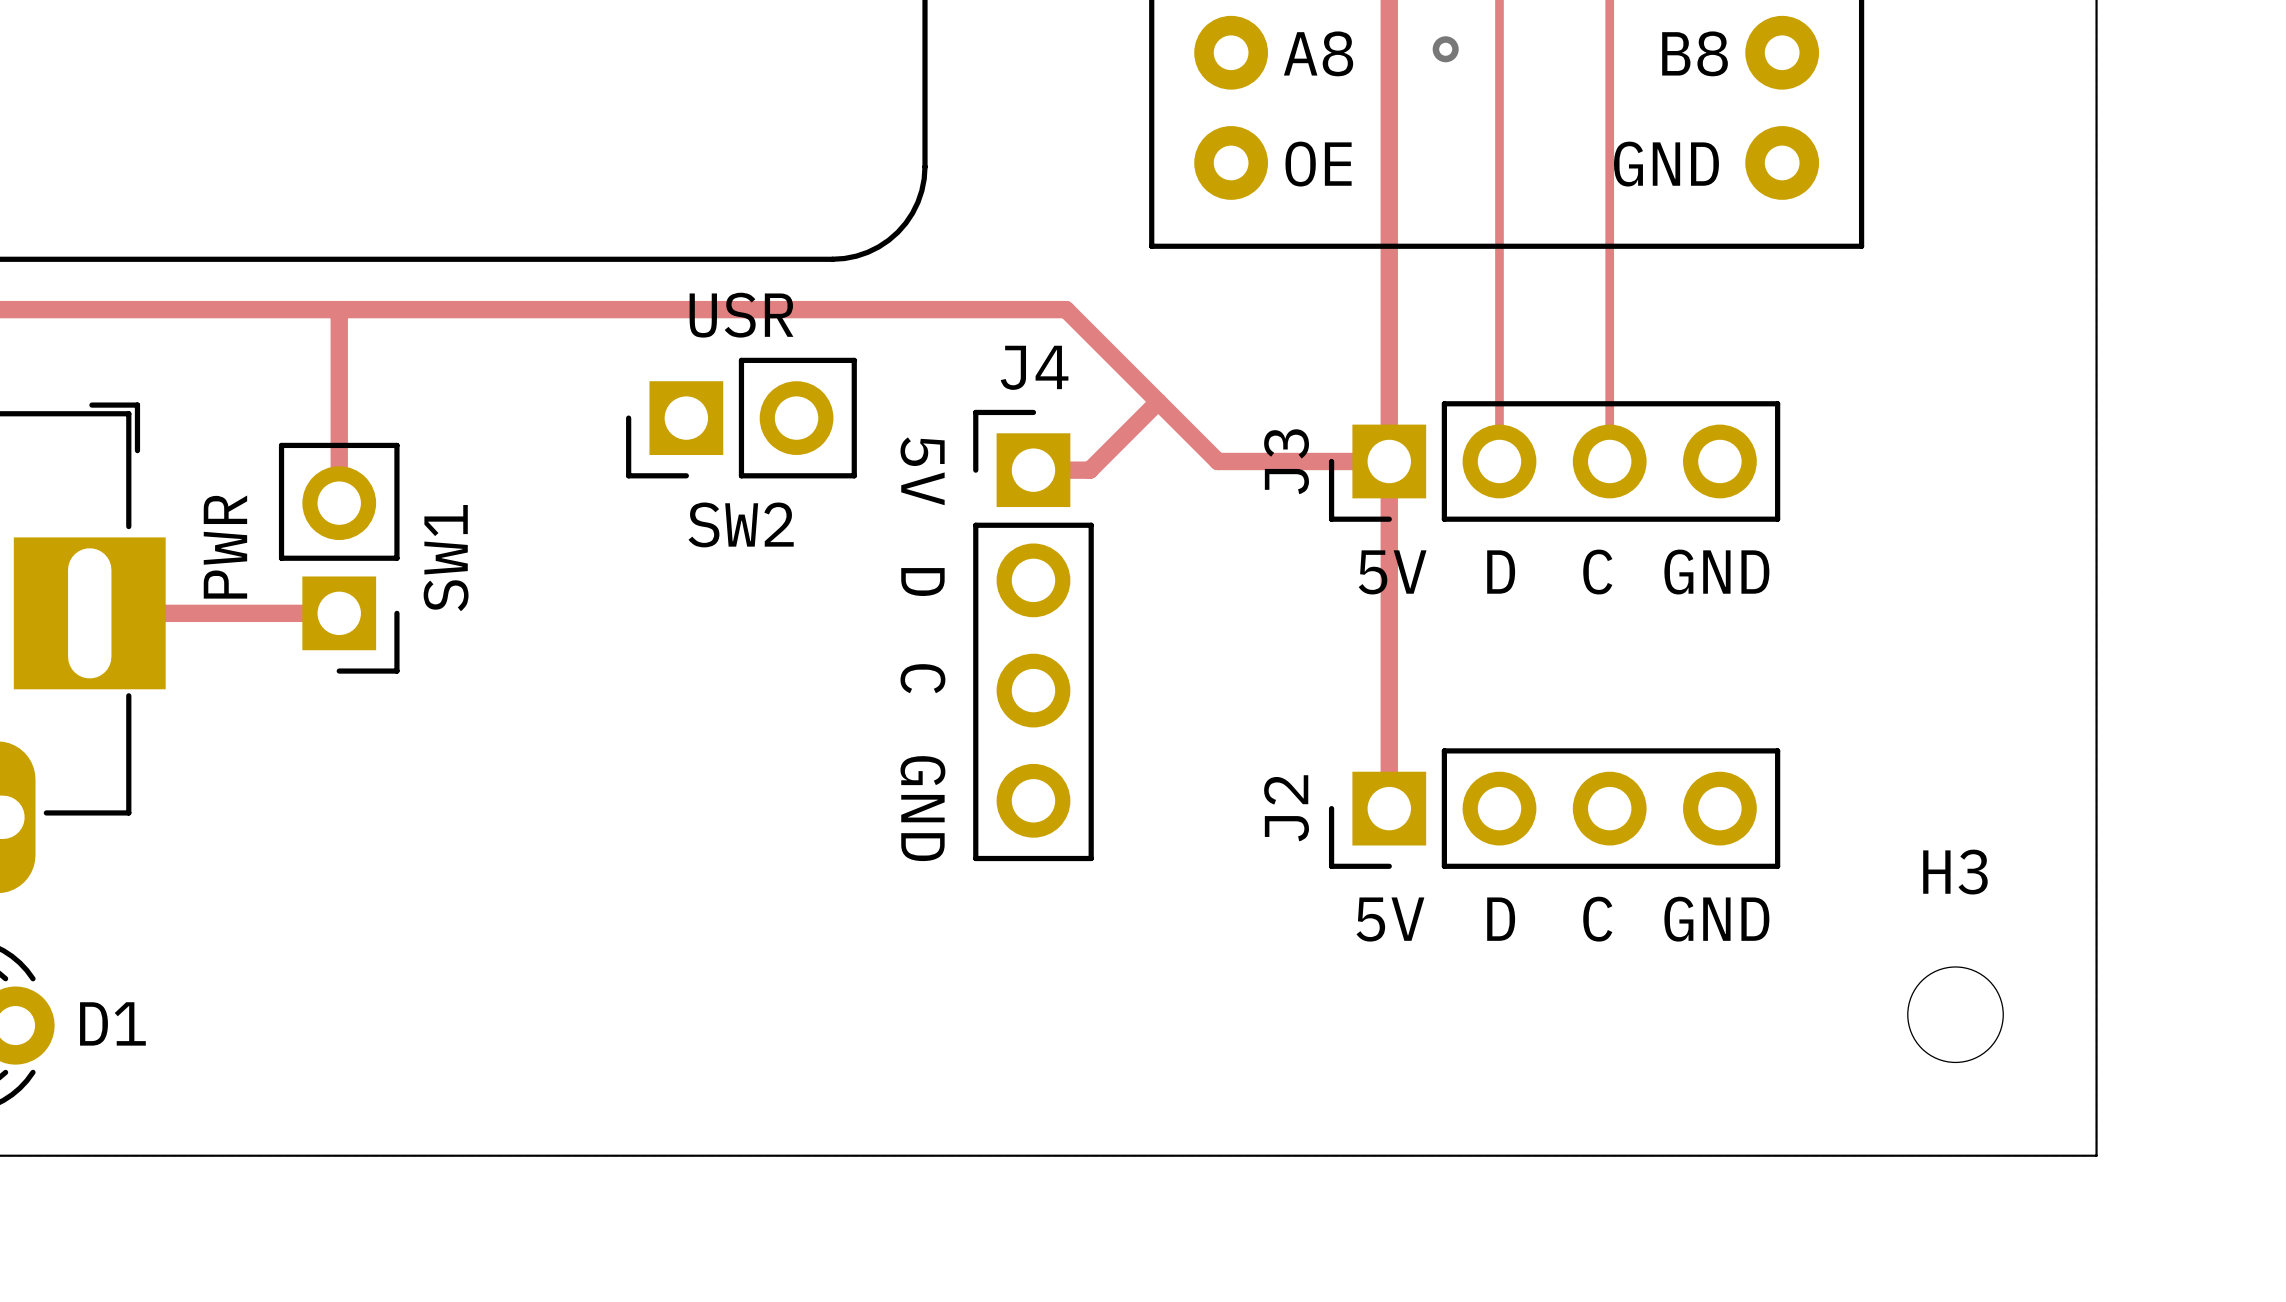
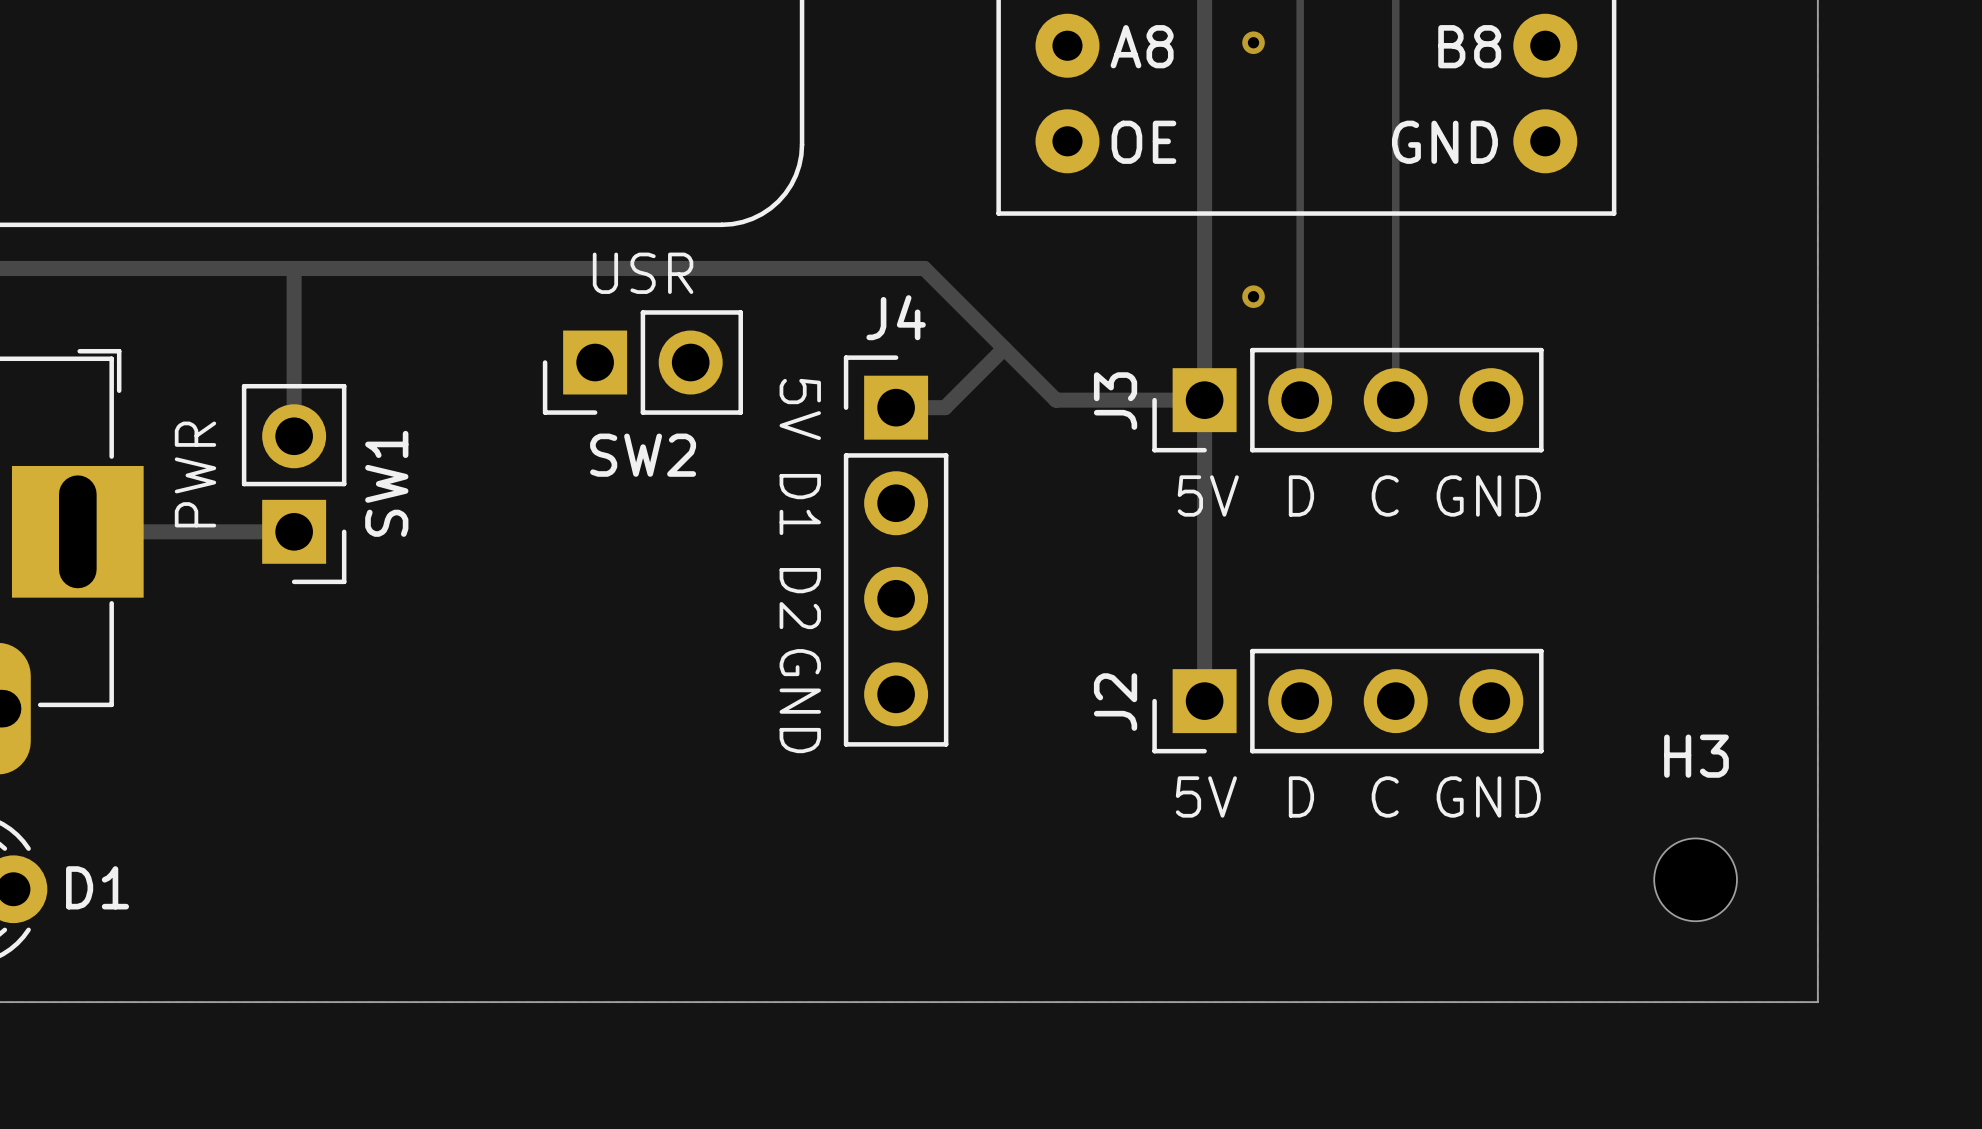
via: none -> (1253, 296)
text: D (922, 582) -> D1 (800, 504)
text: C (922, 678) -> D2 (800, 598)

